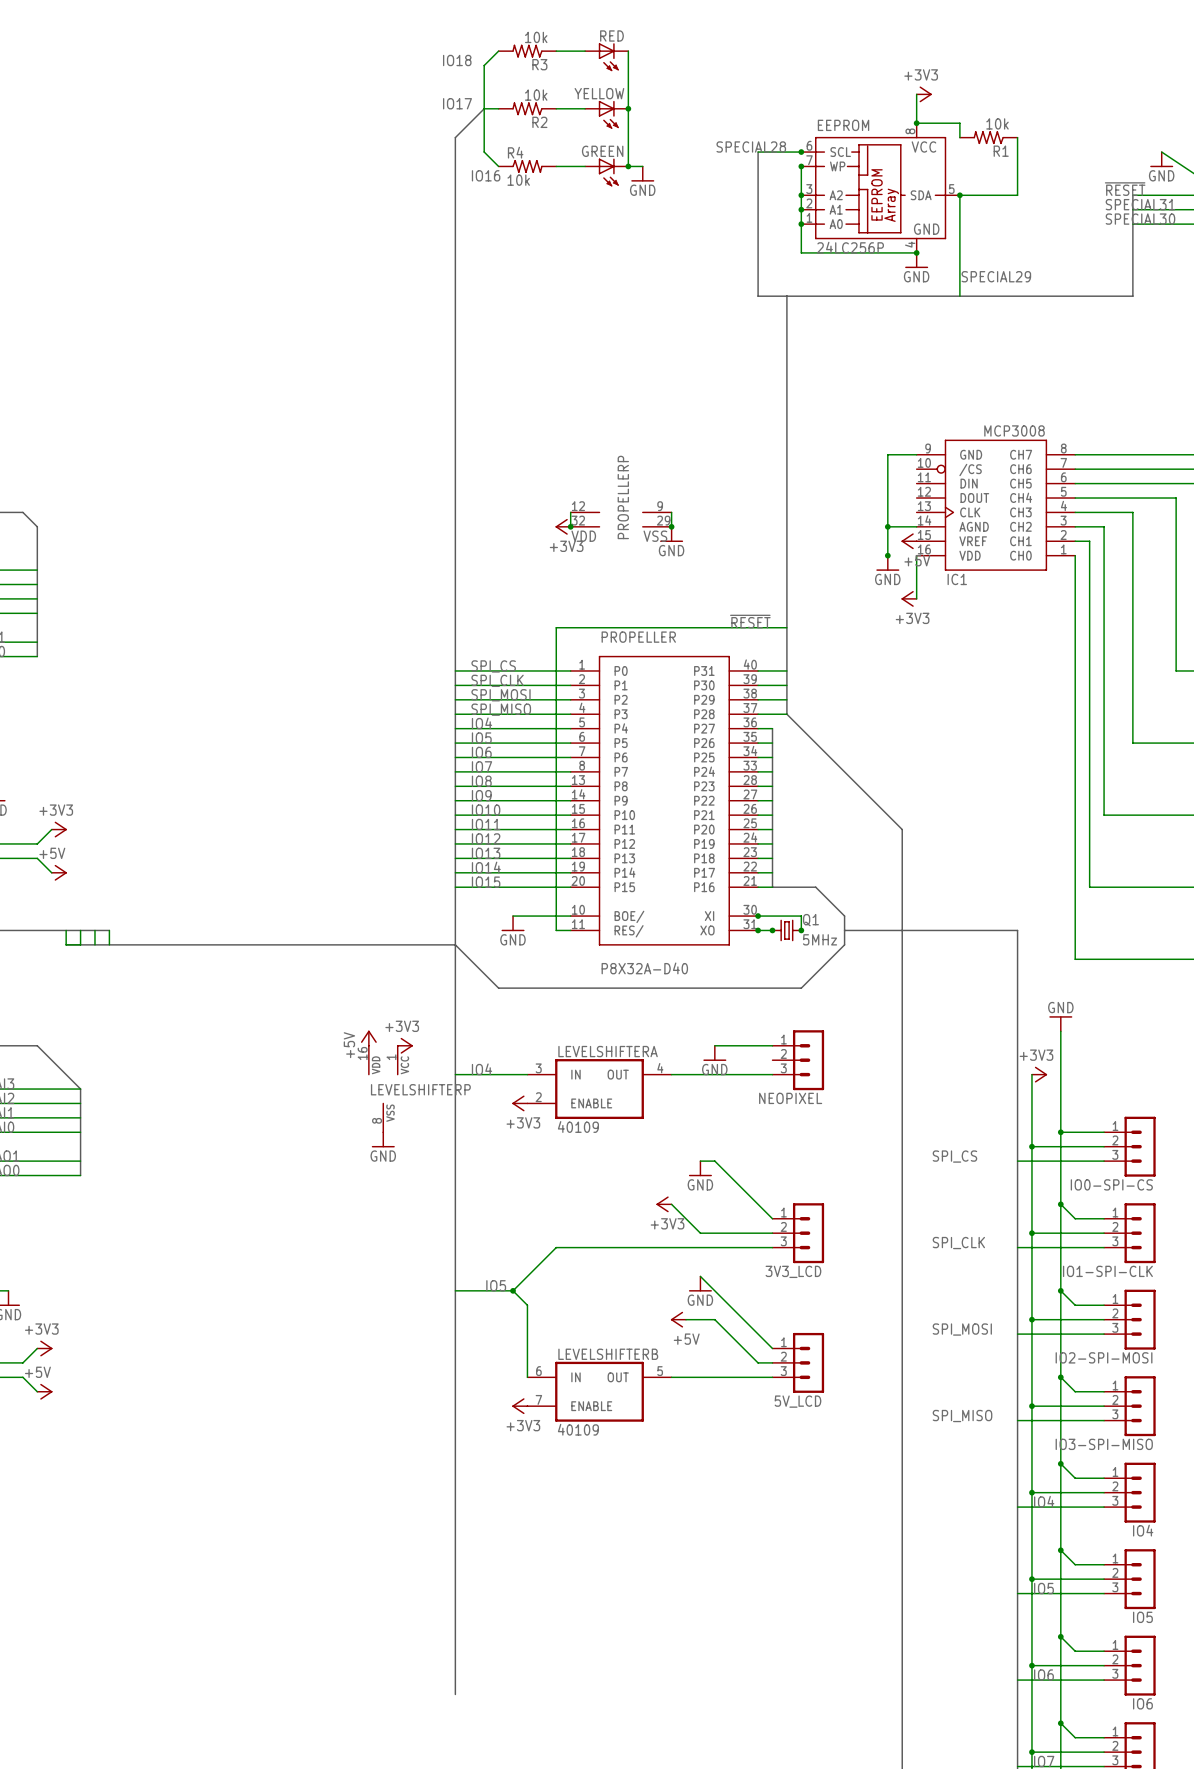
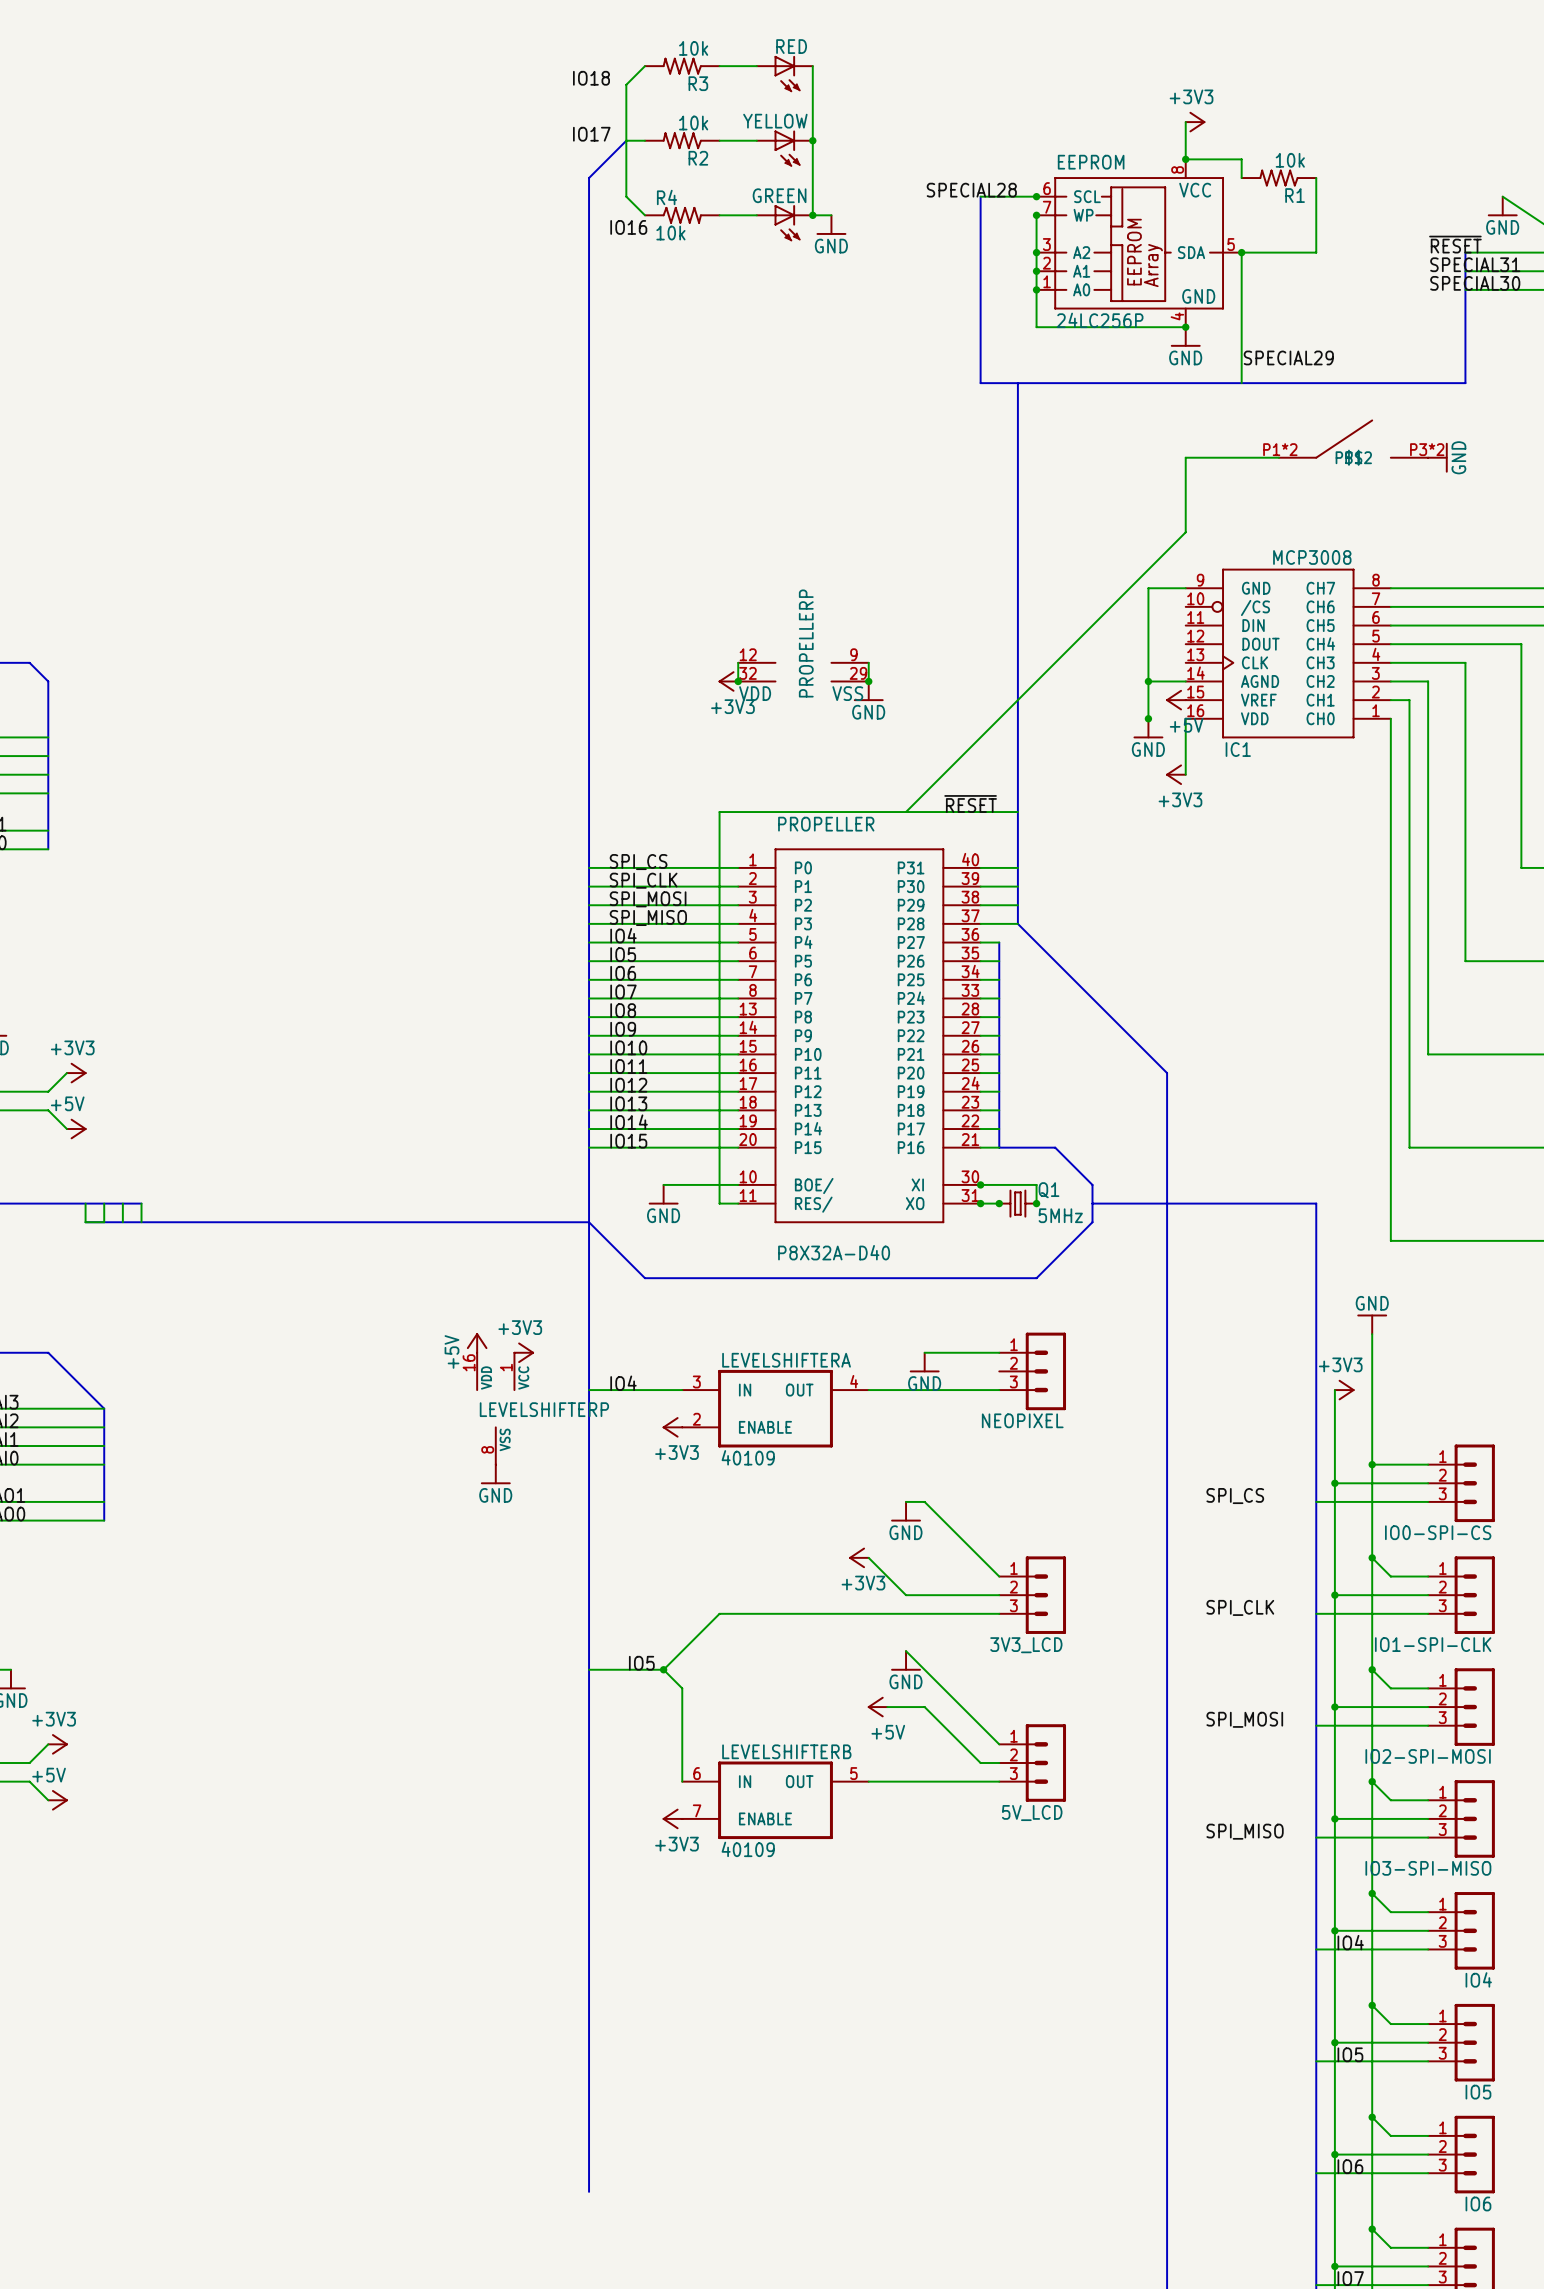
part: none -> (1353, 439)
wire: none -> (1278, 457) (1185, 457) (1185, 532) (906, 812)
power symbol: none -> GND (1437, 457)

